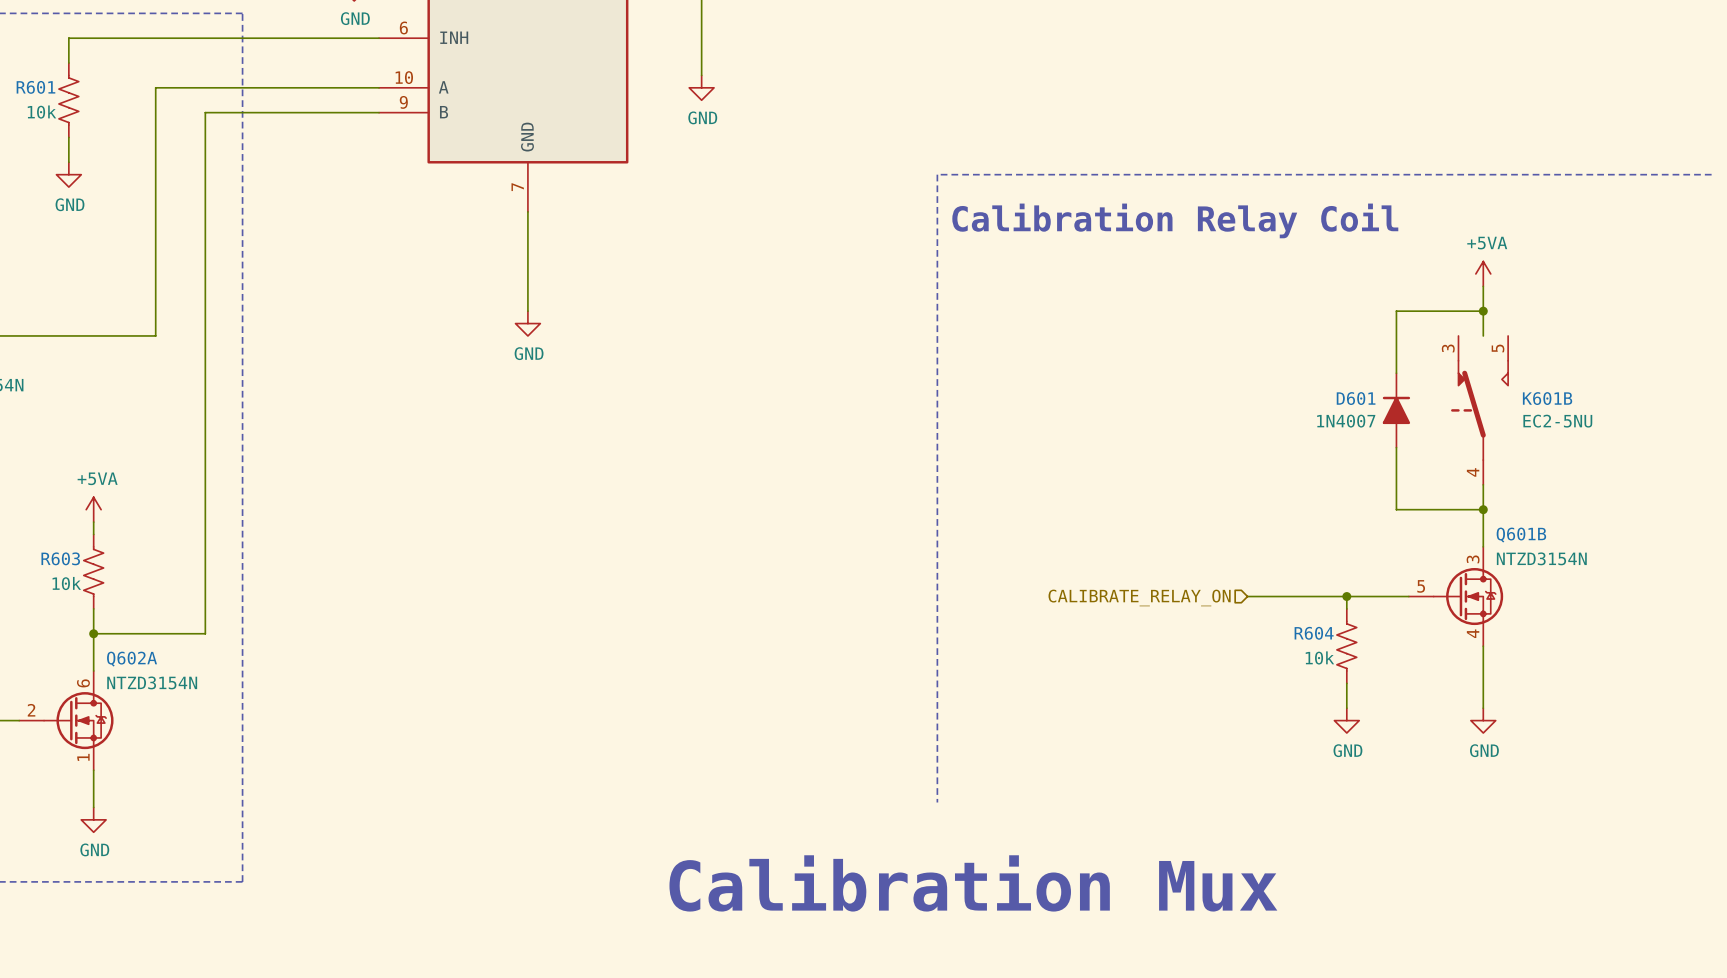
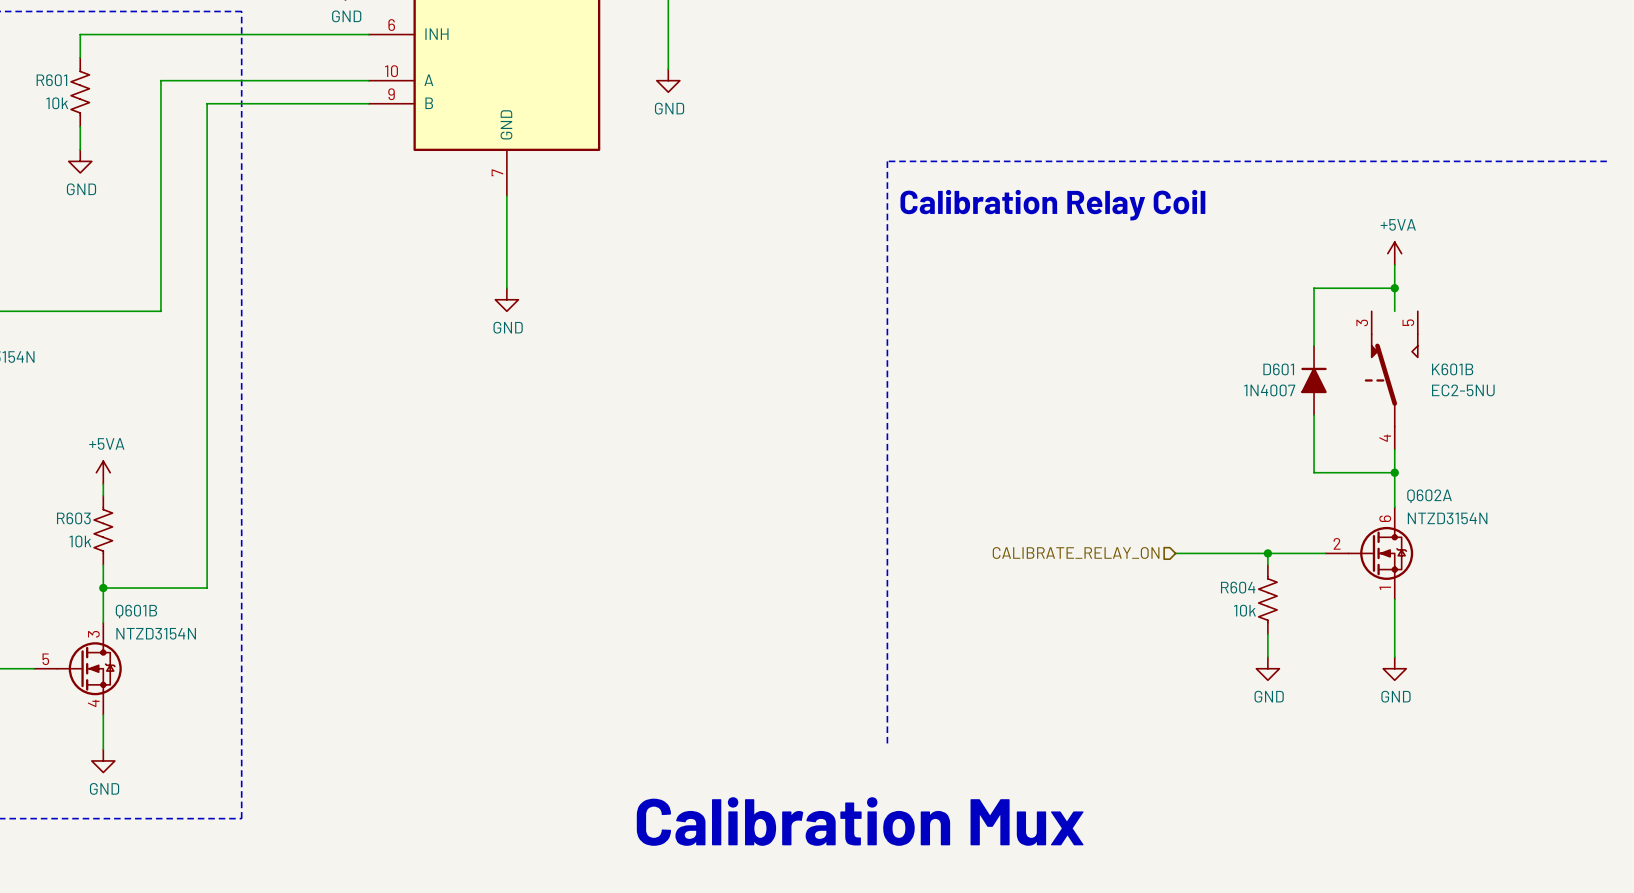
Q601B position: (1456, 596) -> (77, 668)
Q602A position: (66, 720) -> (1369, 553)

